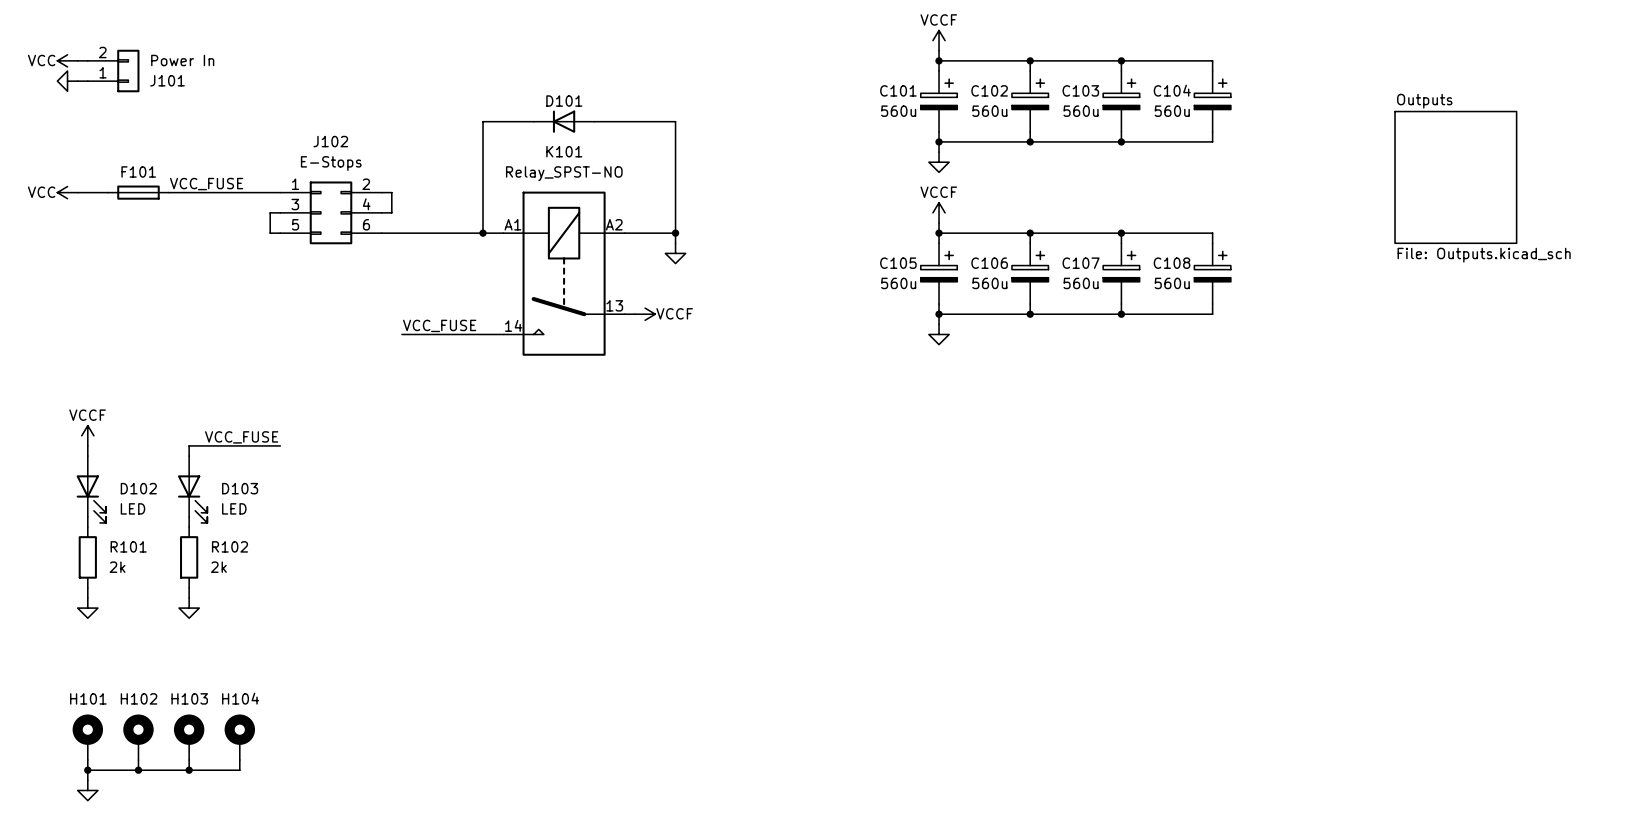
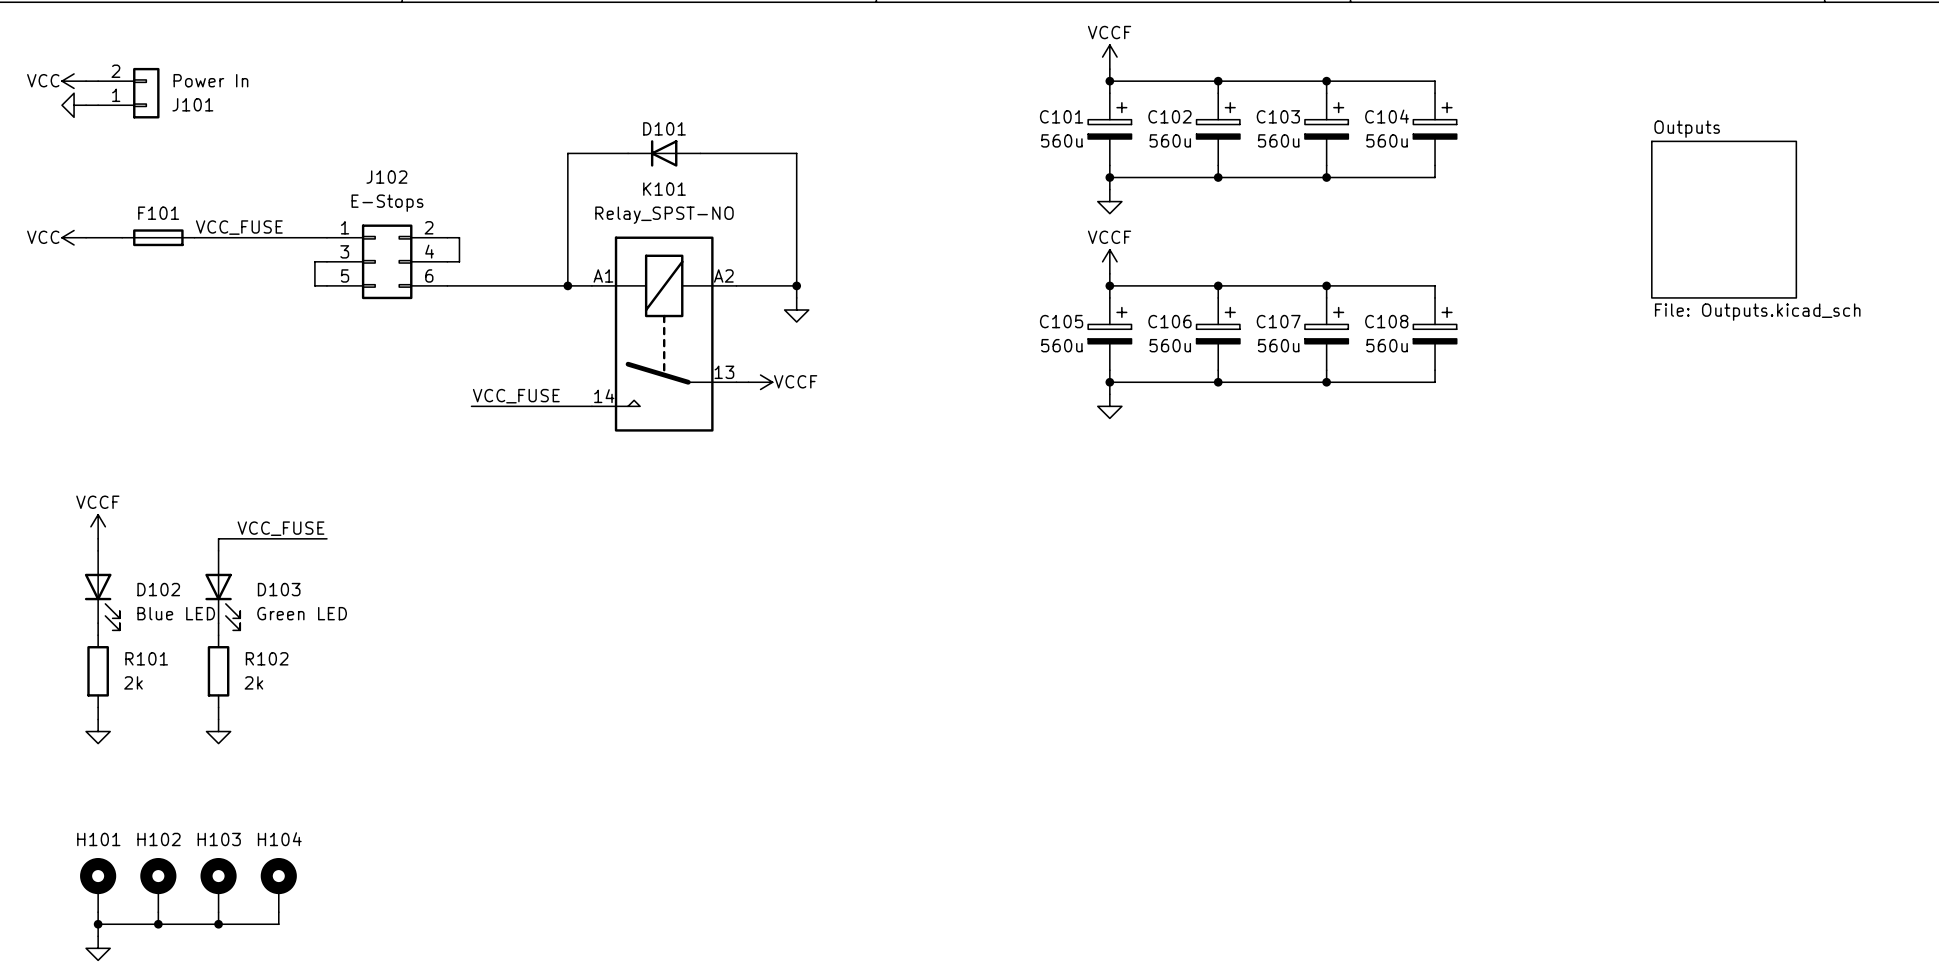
D102 value: LED (133, 508) -> Blue LED (176, 613)
D103 value: LED (234, 508) -> Green LED (302, 613)

